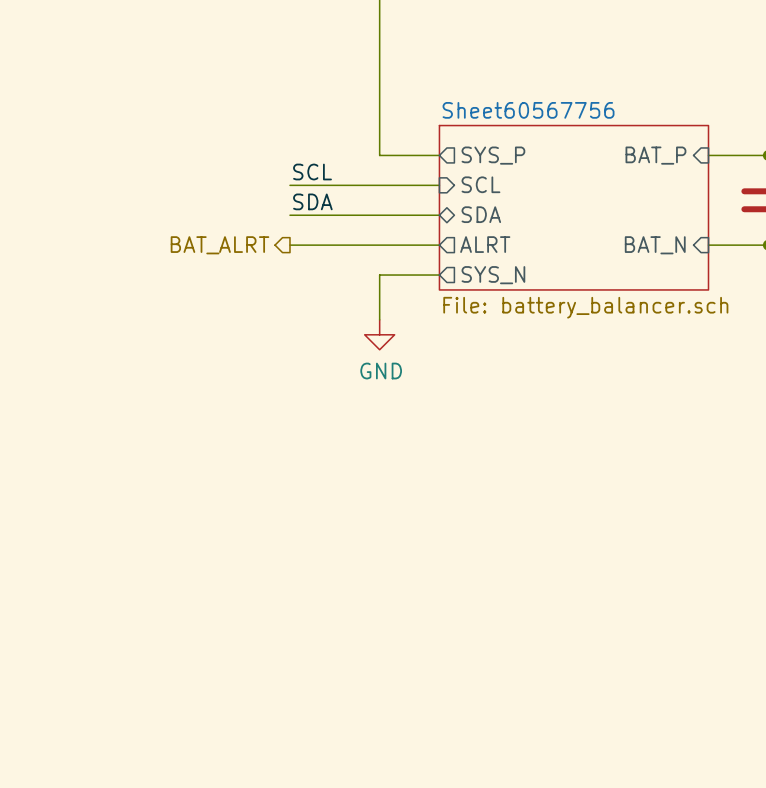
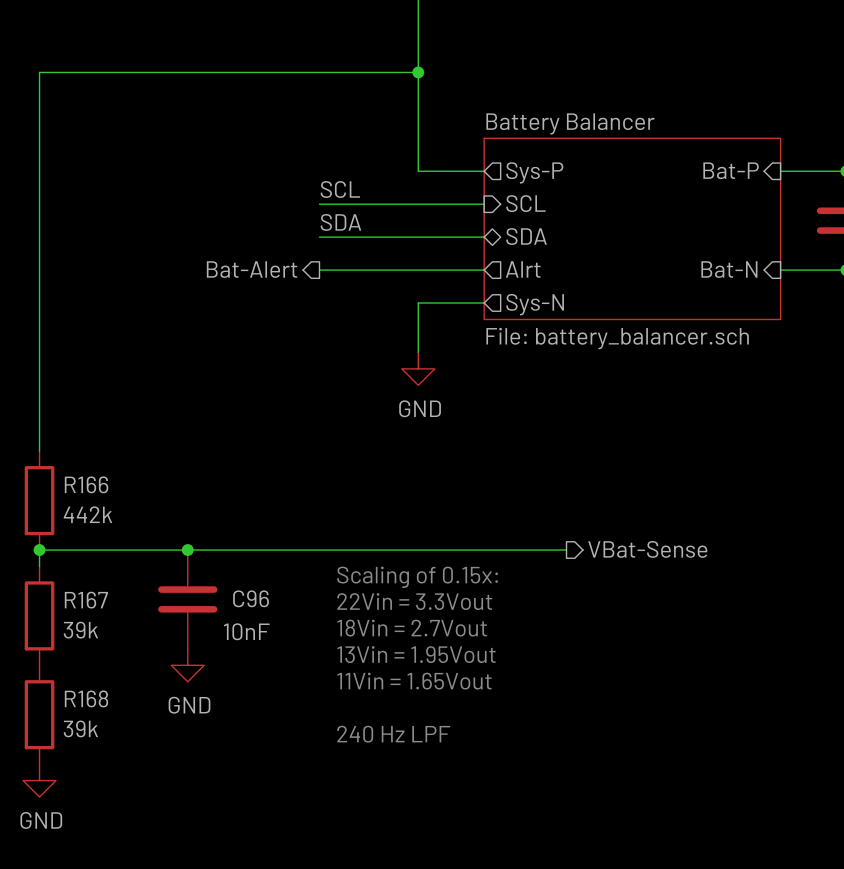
wire: none -> (418, 72) (39, 72) (39, 451)
junction: none -> (418, 72)
sheet Sheet60567756 name: Sheet60567756 (528, 110) -> Battery Balancer (570, 123)
sheet pin: SYS_P (493, 155) -> Sys-P (534, 172)
sheet pin: BAT_P (655, 155) -> Bat-P (731, 170)
sheet pin: ALRT (485, 244) -> Alrt (523, 269)
hierarchical label: BAT_ALRT (219, 245) -> Bat-Alert (252, 269)
sheet pin: BAT_N (655, 245) -> Bat-N (729, 269)
sheet pin: SYS_N (493, 275) -> Sys-N (535, 304)
R166: none -> 442k (39, 500)
hierarchical label: none -> VBat-Sense (647, 549)
junction: none -> (39, 550)
junction: none -> (187, 550)
wire: none -> (566, 550) (39, 550) (39, 566)
text: none -> Scaling of 0.15x: (417, 577)
C96: none -> 10nF (187, 599)
text: none -> 22Vin = 3.3Vout (414, 601)
R167: none -> 39k (39, 615)
text: none -> 18Vin = 2.7Vout (412, 628)
text: none -> 13Vin = 1.95Vout (416, 654)
power symbol: none -> GND (187, 665)
text: none -> 11Vin = 1.65Vout (414, 681)
R168: none -> 39k (39, 714)
text: none -> 240 Hz LPF (393, 734)
power symbol: none -> GND (39, 780)

